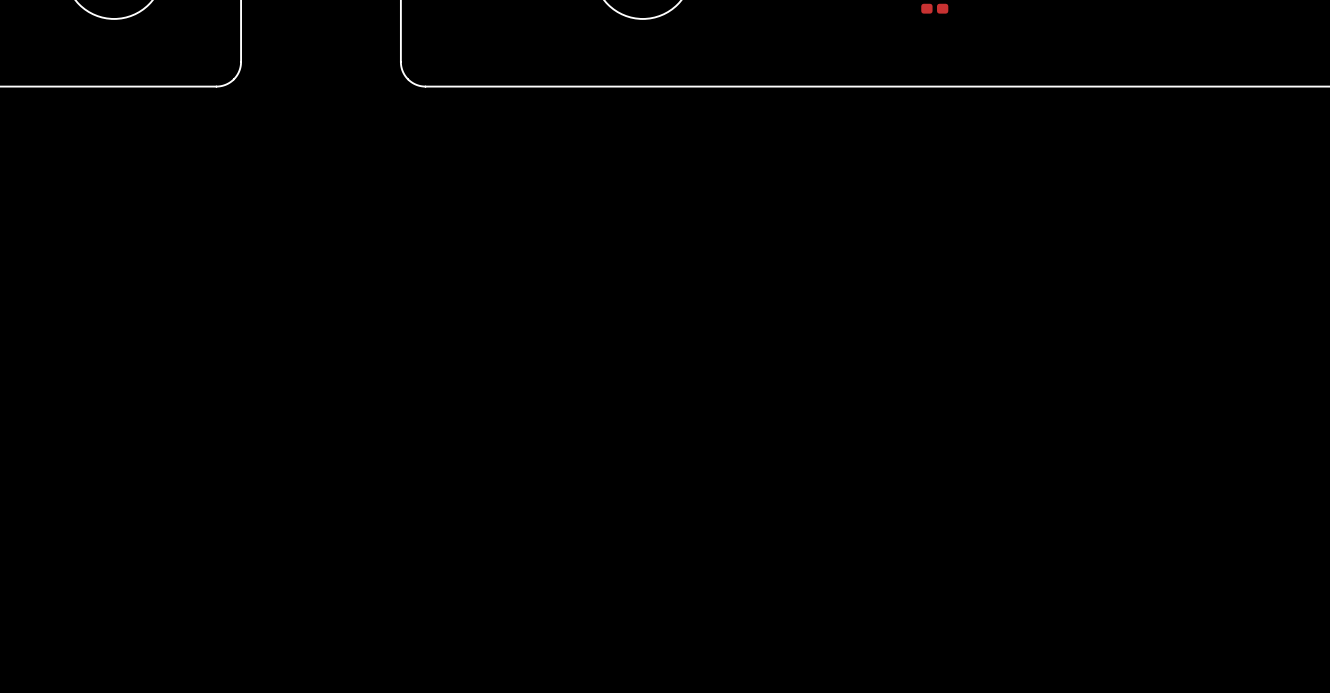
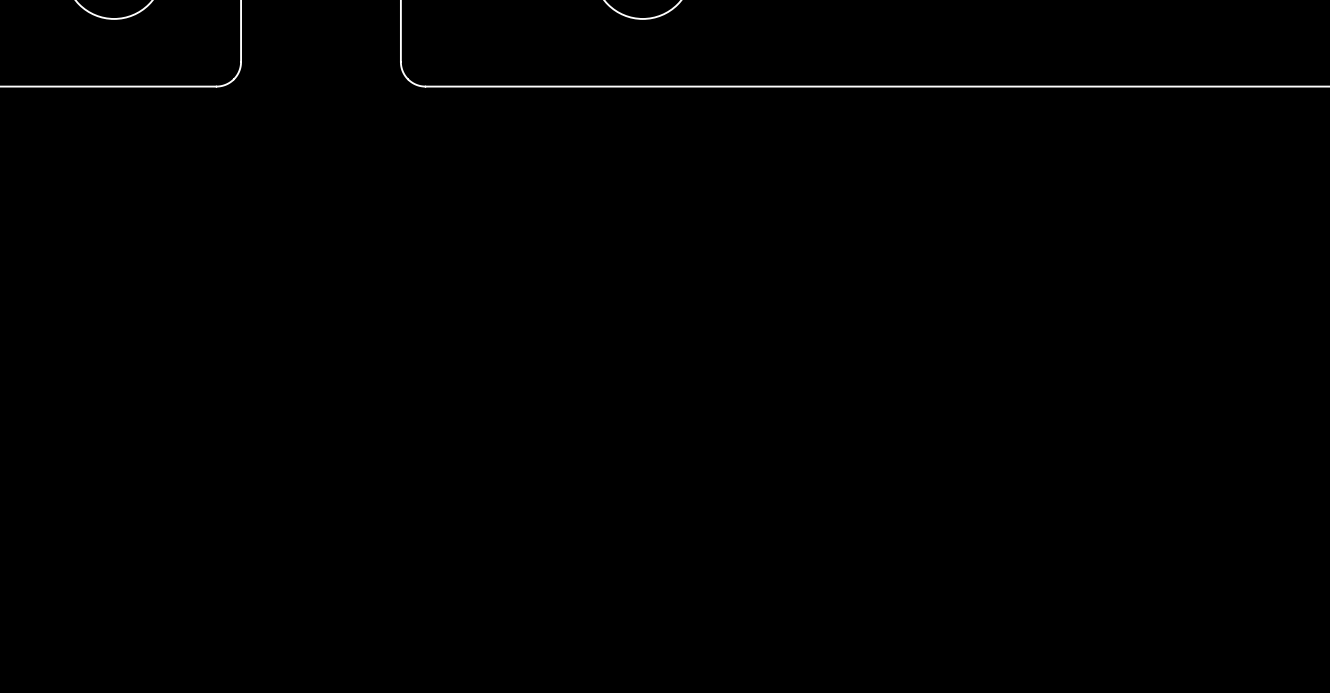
part: (934, 8) -> none

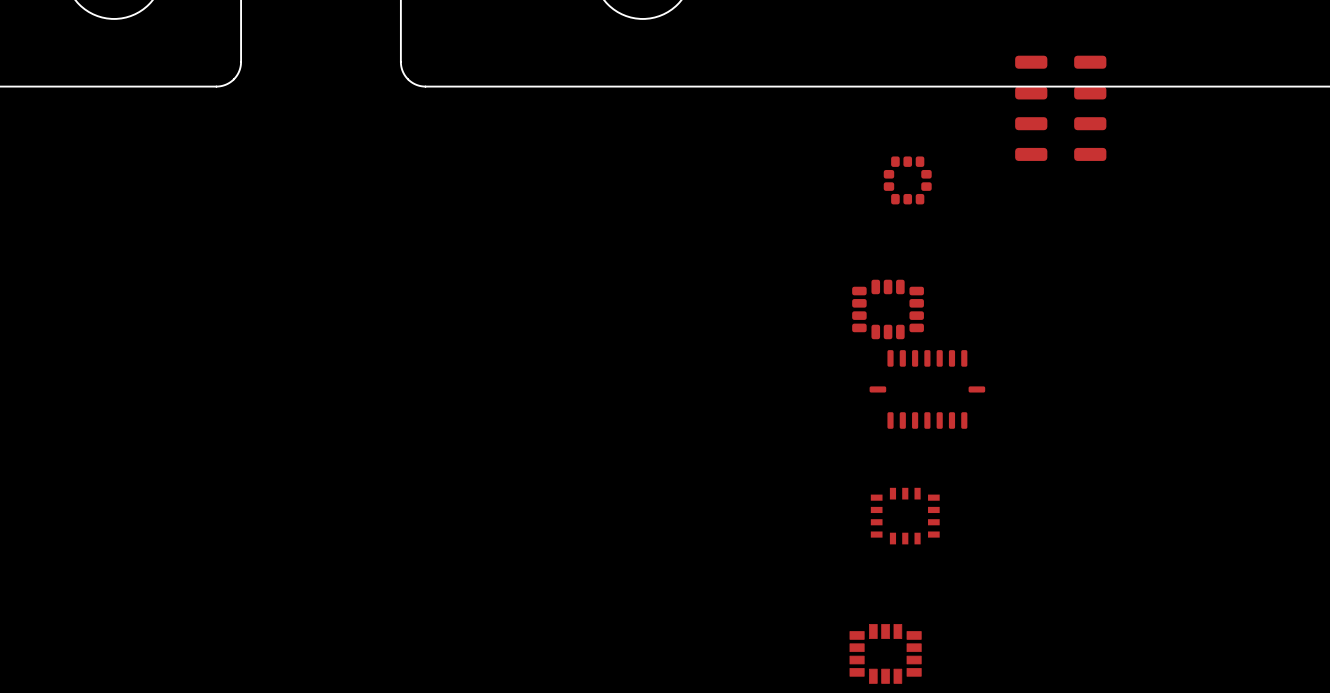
part: none -> (1060, 108)
part: none -> (907, 180)
part: none -> (888, 309)
part: none -> (927, 389)
part: none -> (905, 516)
part: none -> (885, 653)

